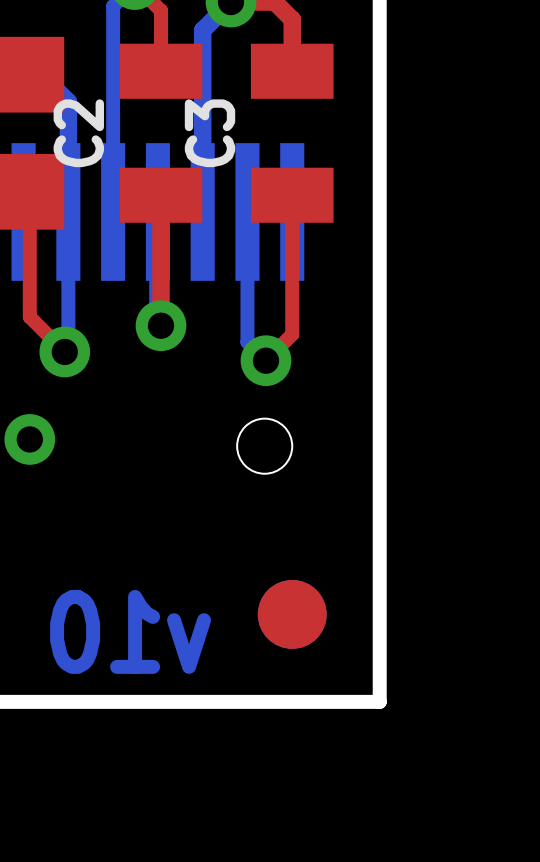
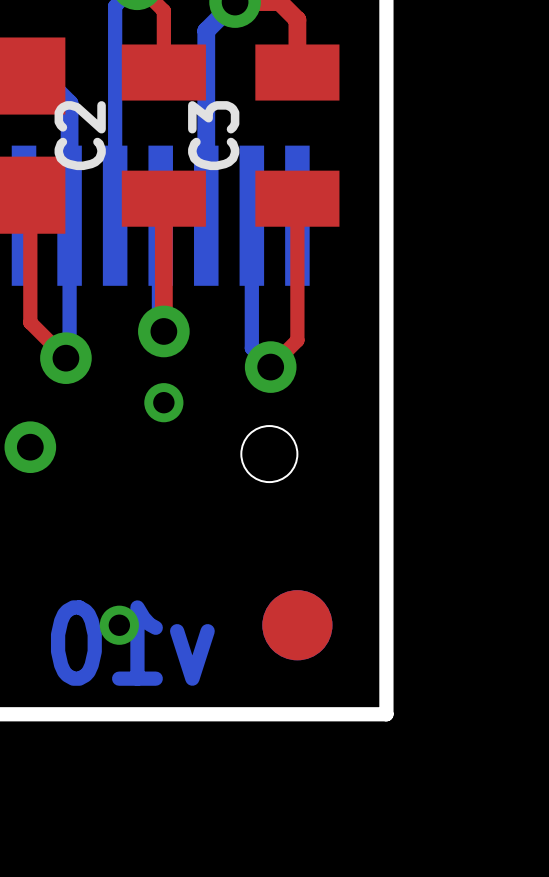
via: none -> (163, 402)
via: none -> (119, 625)

